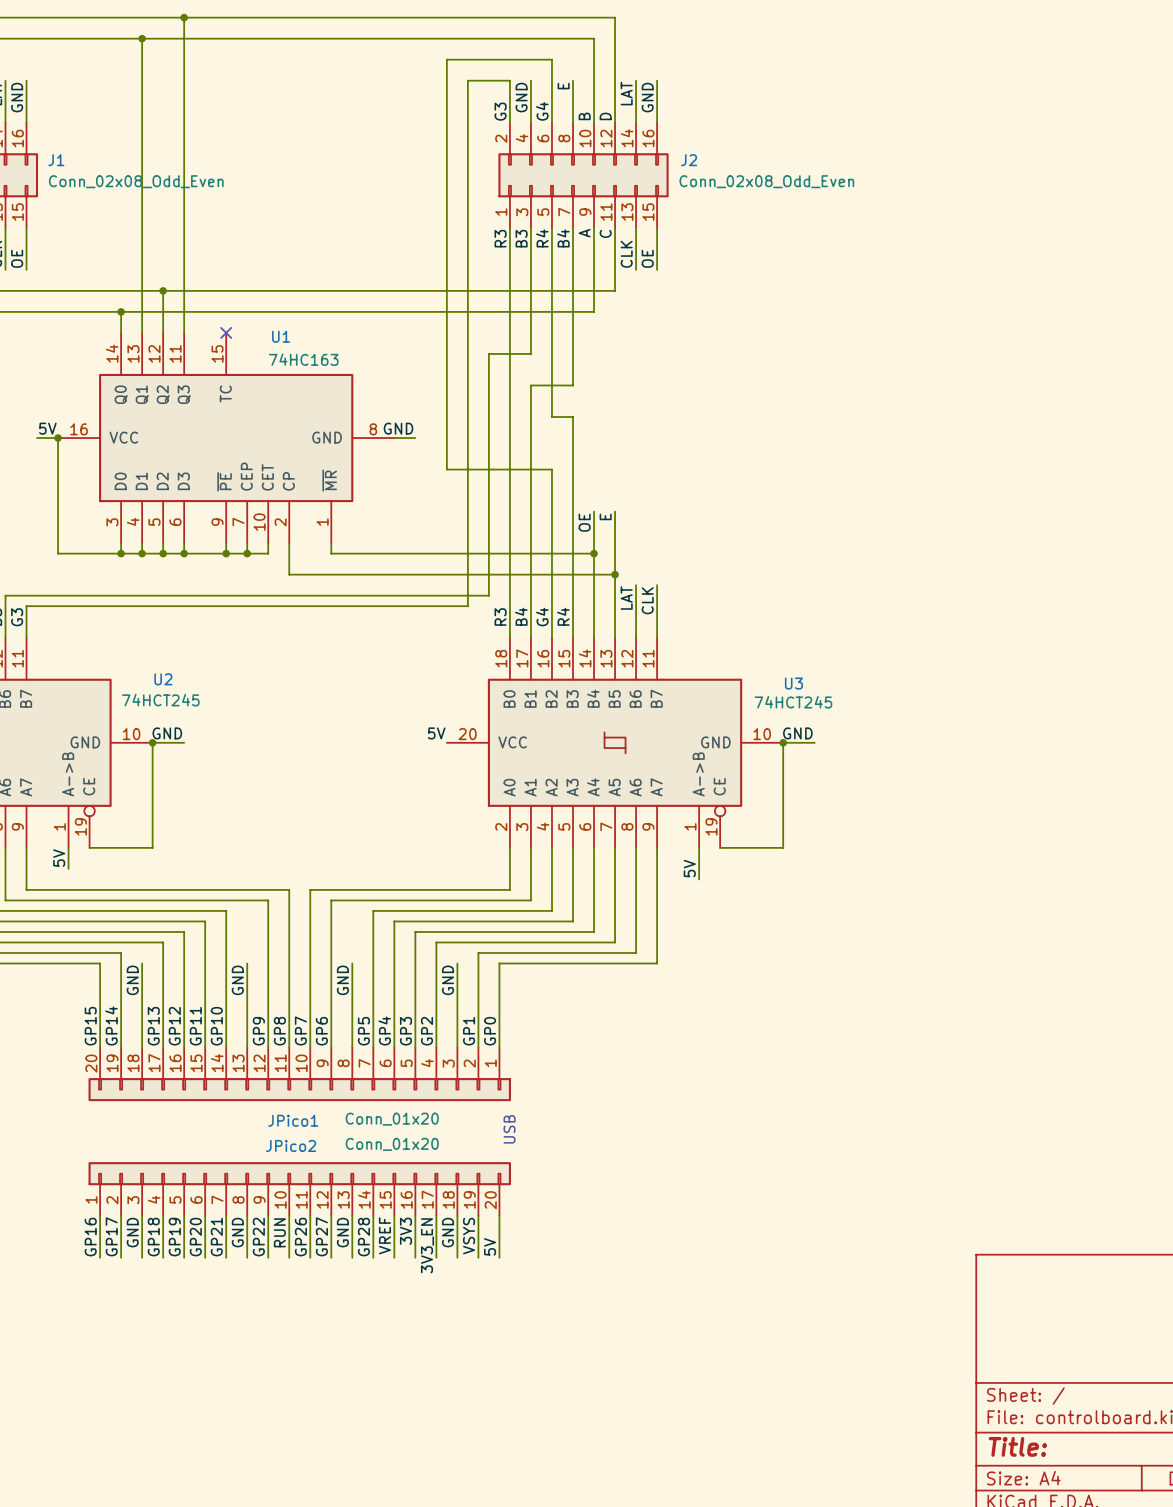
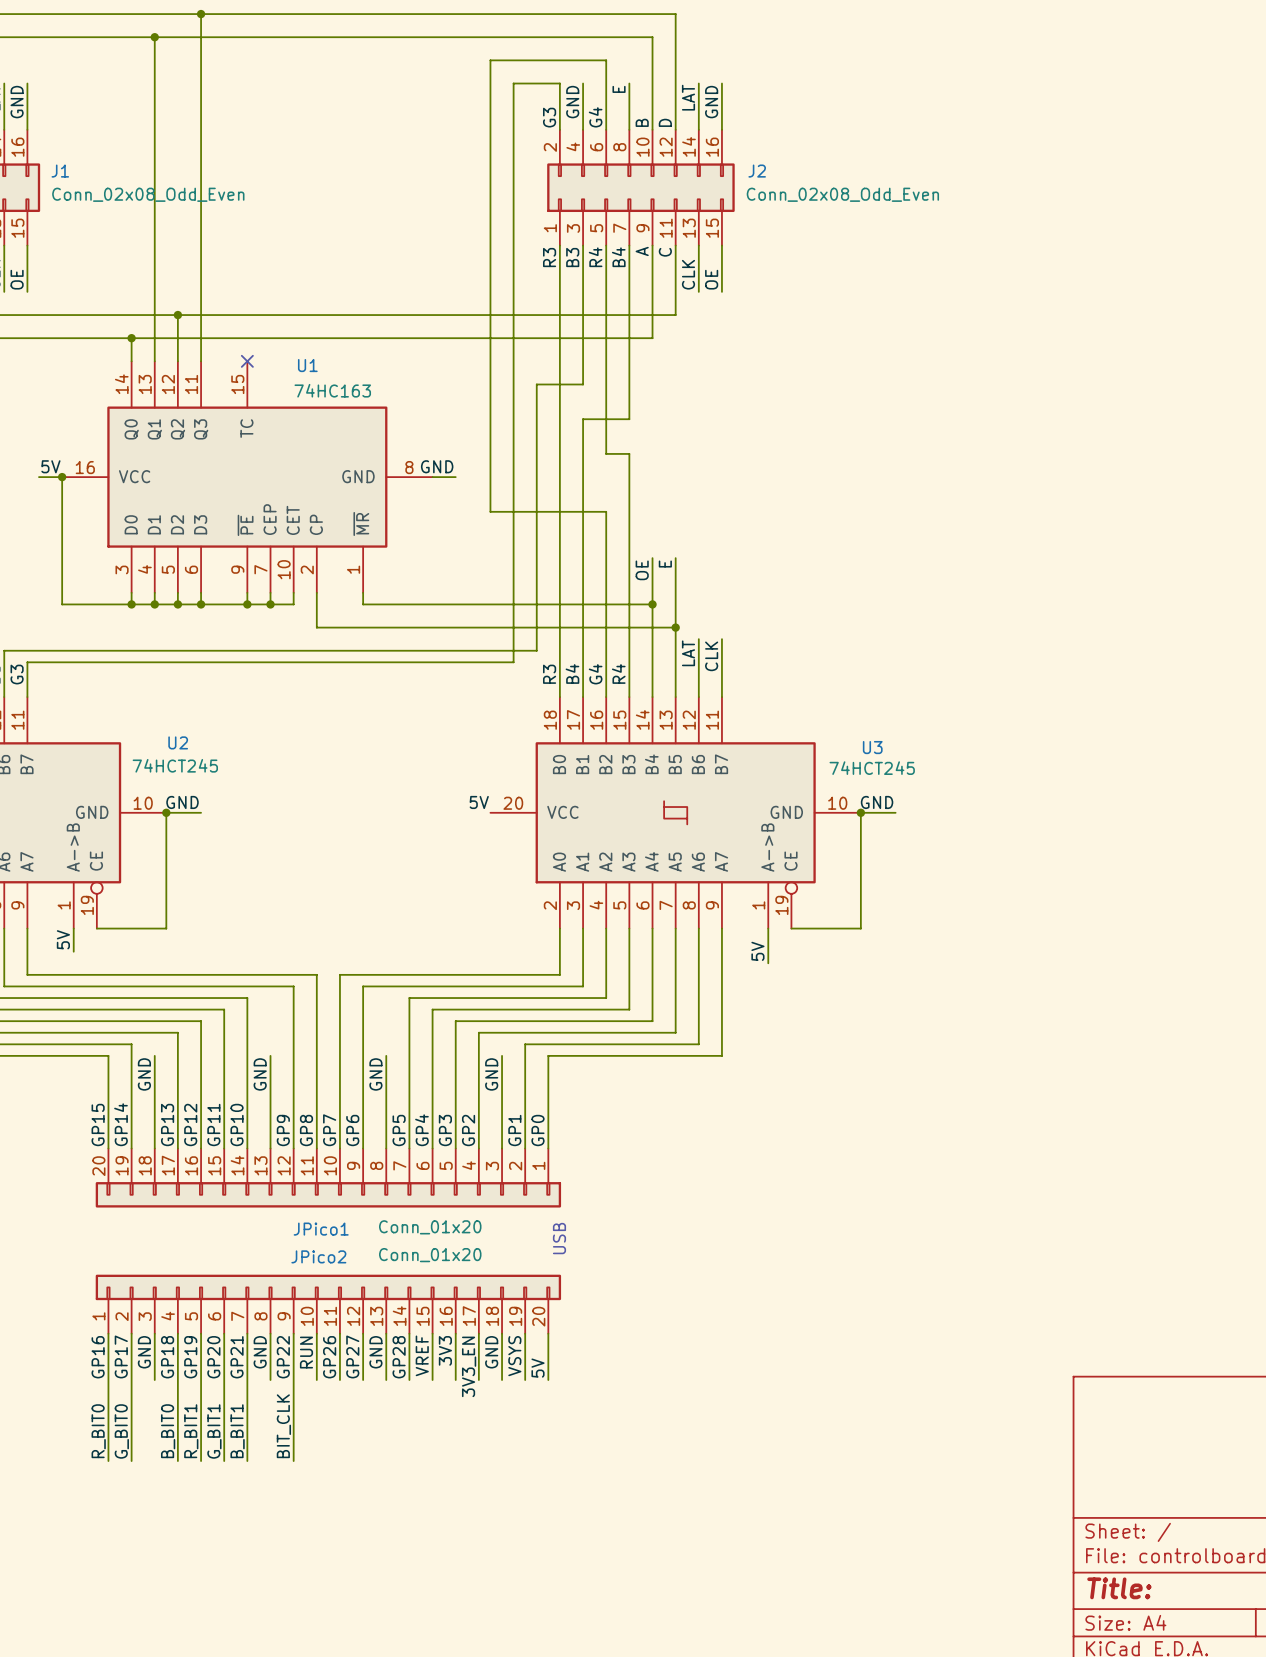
wire: none -> (108, 1380) (108, 1461)
wire: none -> (131, 1380) (131, 1461)
wire: none -> (177, 1380) (177, 1461)
wire: none -> (201, 1380) (201, 1461)
wire: none -> (224, 1380) (224, 1461)
wire: none -> (247, 1380) (247, 1461)
wire: none -> (293, 1380) (293, 1461)
label: none -> BIT_CLK (283, 1426)
label: none -> R_BIT0 (98, 1431)
label: none -> G_BIT0 (121, 1431)
label: none -> B_BIT0 (168, 1431)
label: none -> R_BIT1 (191, 1431)
label: none -> G_BIT1 (214, 1431)
label: none -> B_BIT1 (237, 1431)

